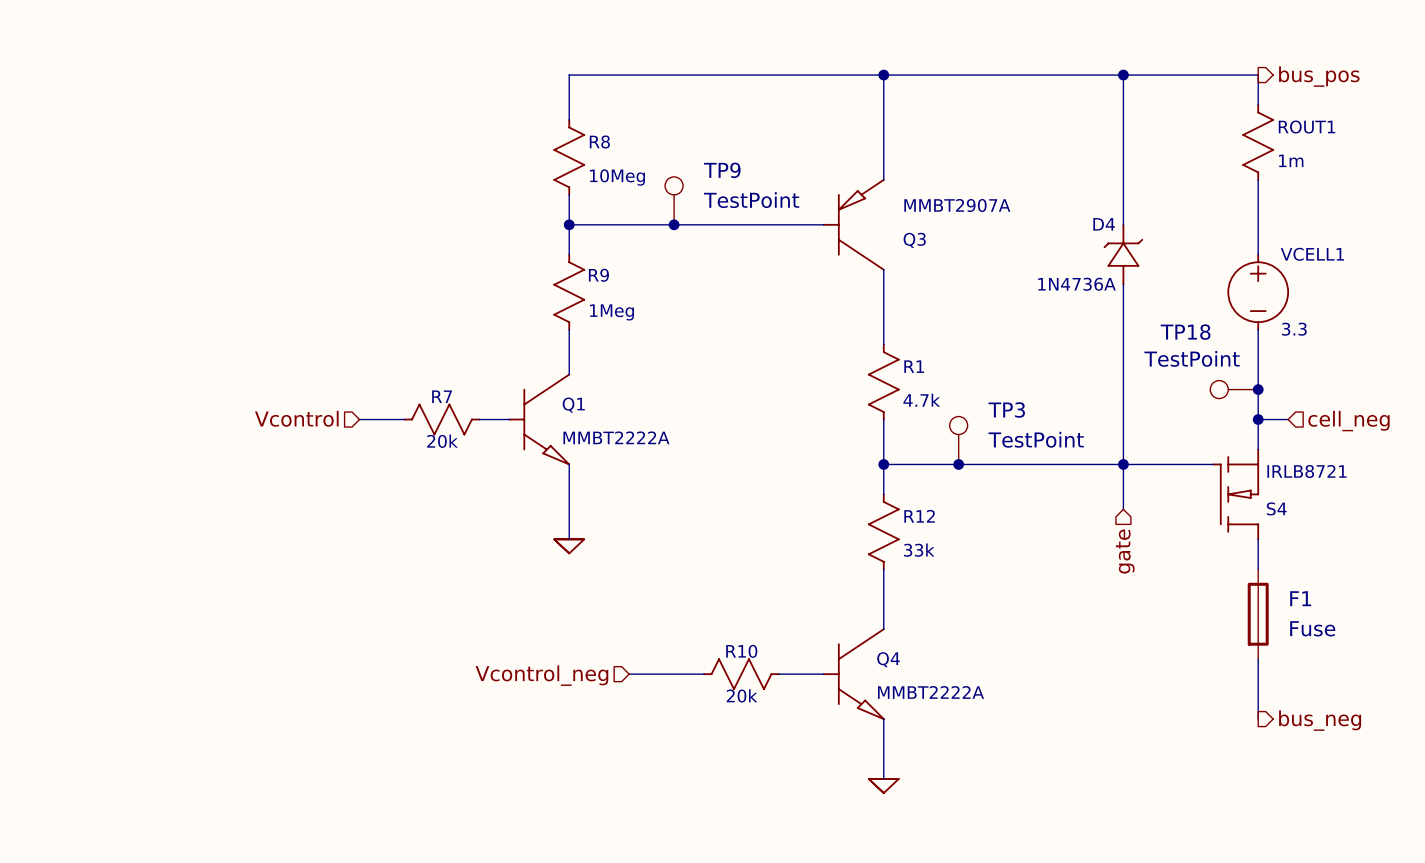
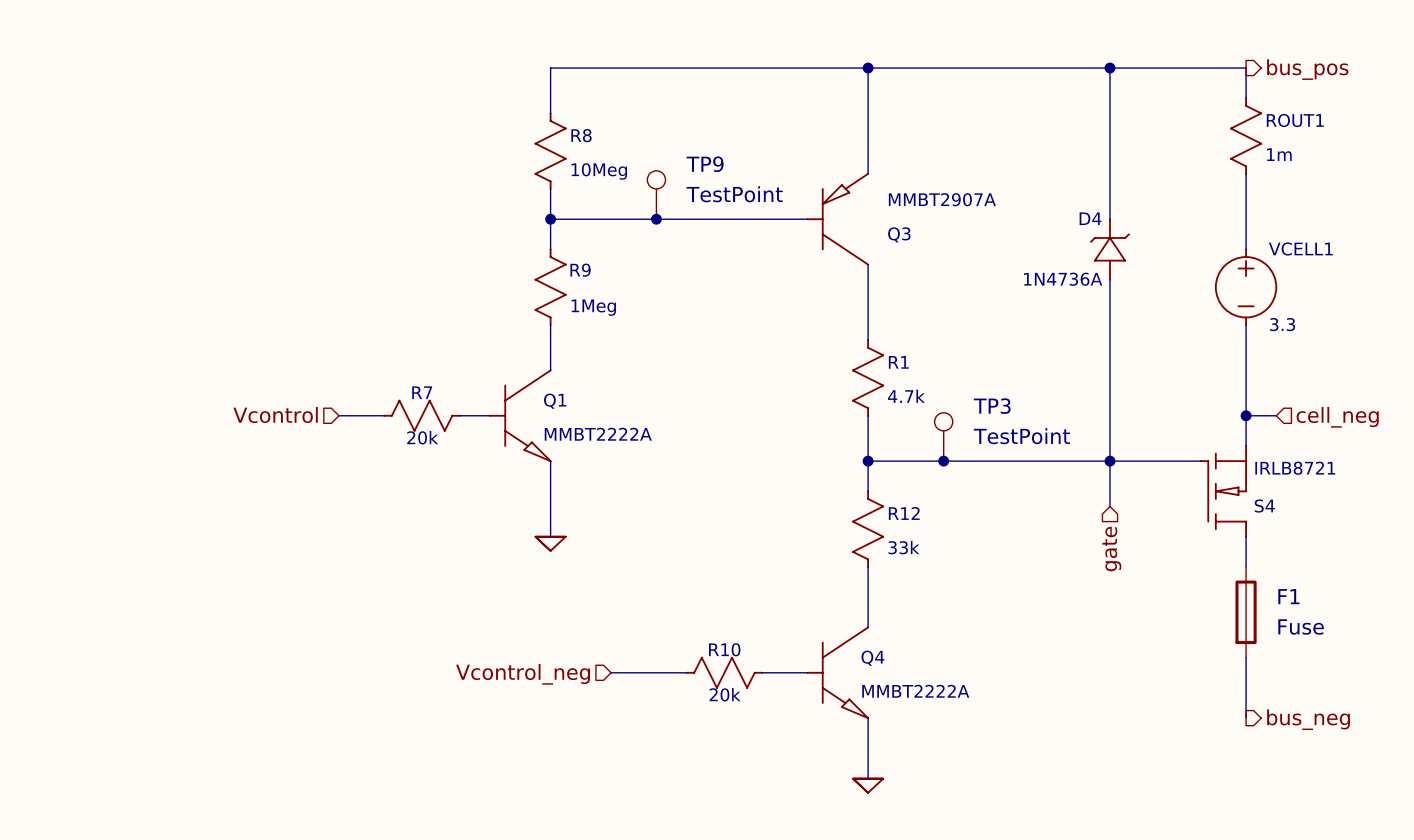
TP18: TestPoint (1234, 389) -> none
junction: (1258, 389) -> none

